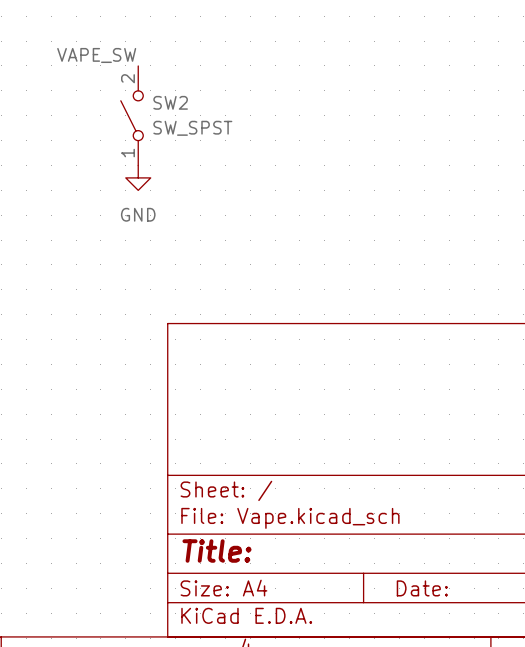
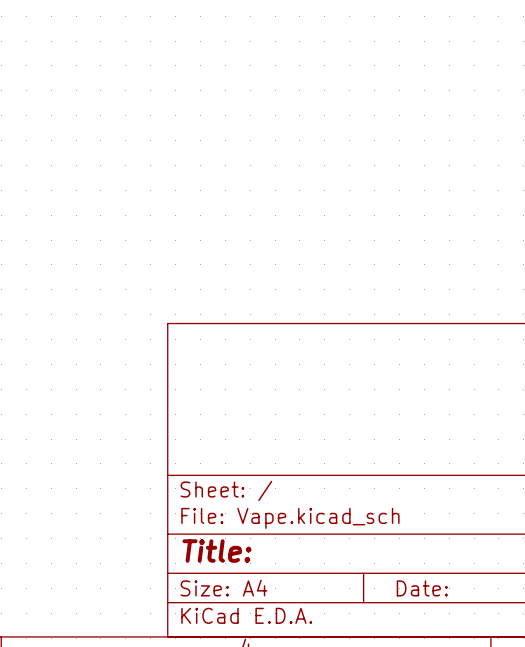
label: VAPE_SW (96, 55) -> none
SW2: SW_SPST (132, 115) -> none
power symbol: GND (138, 177) -> none

